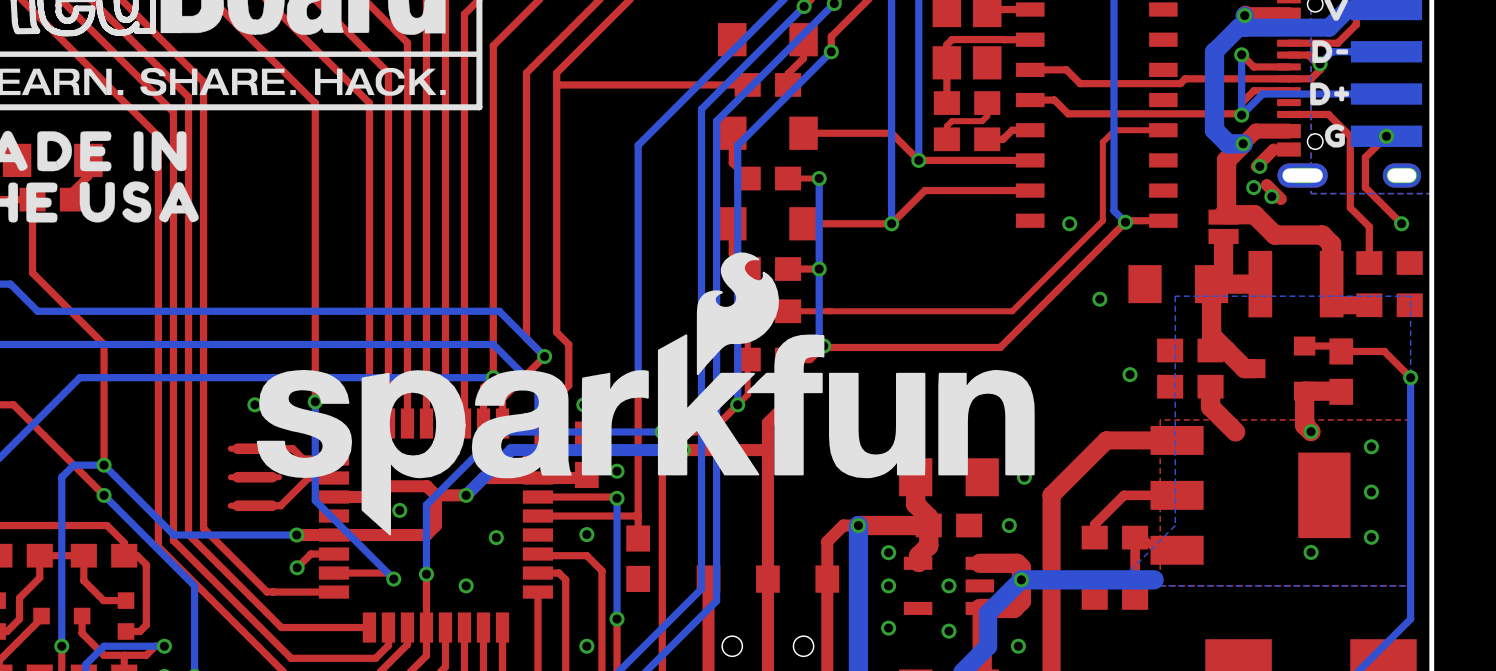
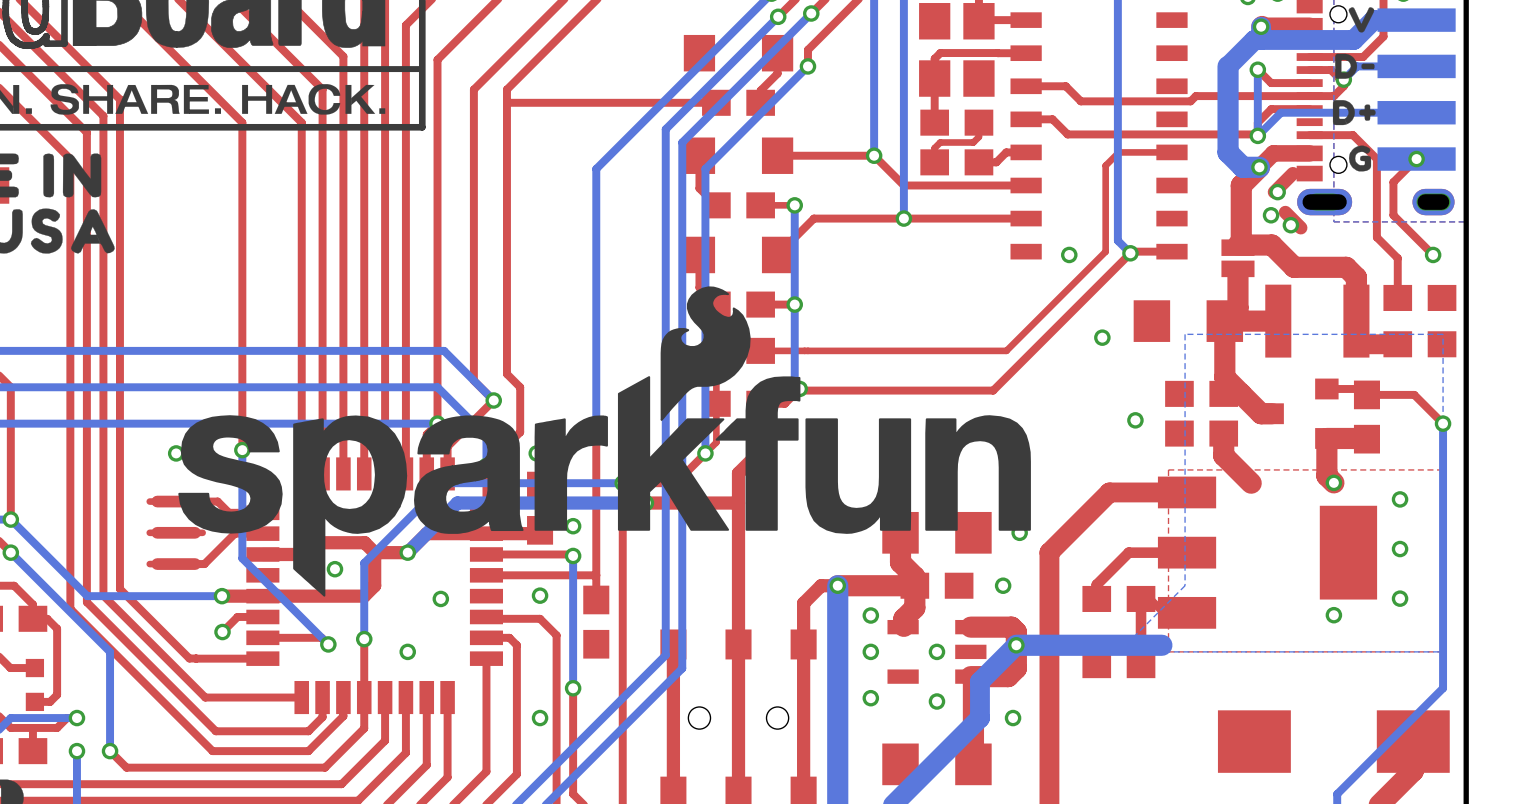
bottom track: (891, 133) (891, 223) -> none
via: none -> (874, 155)
bottom track: none -> (903, 185) (903, 218)
via: (918, 160) -> none
via: none -> (903, 218)
top track: (924, 190) (891, 223) (803, 223) -> (910, 218) (813, 218) (777, 254)
via: (891, 223) -> none

